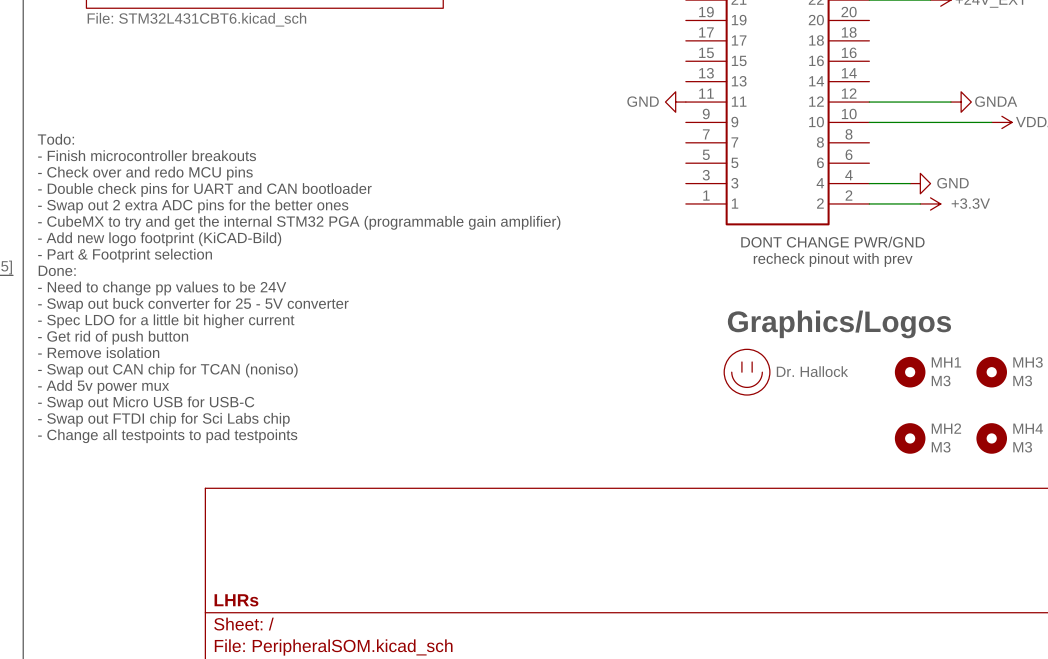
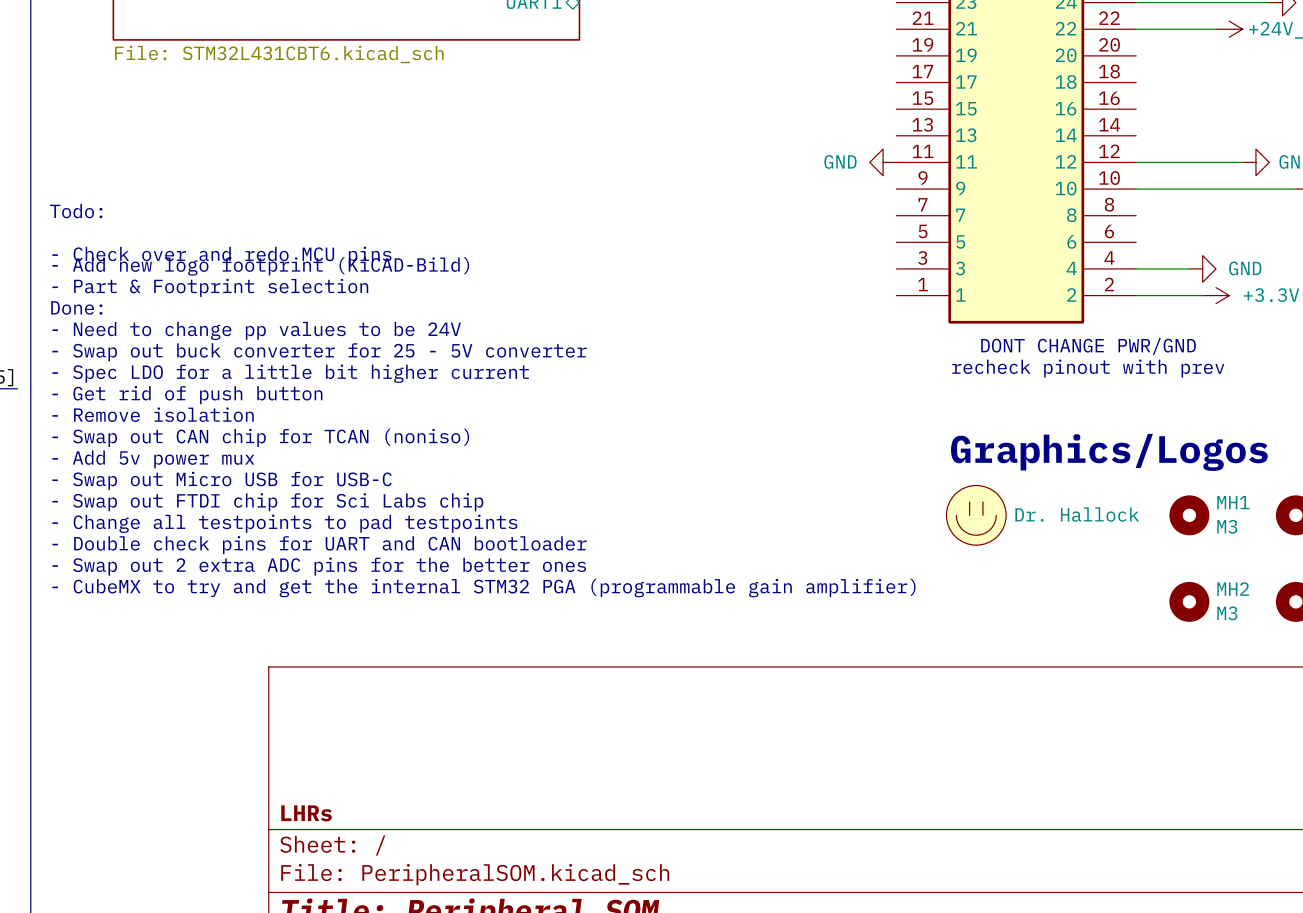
text: - Finish microcontroller breakouts (147, 155) -> none
text: - Double check pins for UART and CAN bootloader (204, 190) -> none
text: - Swap out 2 extra ADC pins for the better ones (193, 206) -> none
text: - CubeMX to try and get the internal STM32 PGA (programmable gain amplifier) (299, 222) -> none
text position: - Add new logo footprint (KiCAD-Bild) (159, 239) -> - Add new logo footprint (KiCAD-Bild) (260, 266)
text position: - Part & Footprint selection (125, 255) -> - Part & Footprint selection (210, 287)
text position: Done: (57, 270) -> Done: (76, 307)
text position: - Need to change pp values to be 24V (162, 288) -> - Need to change pp values to be 24V (256, 330)
text position: - Swap out buck converter for 25 - 5V converter (193, 304) -> - Swap out buck converter for 25 - 5V converter (319, 352)
text position: - Spec LDO for a little bit higher current (166, 321) -> - Spec LDO for a little bit higher current (290, 373)
text position: - Get rid of push button (113, 337) -> - Get rid of push button (187, 395)
text position: - Remove isolation (98, 352) -> - Remove isolation (153, 414)
text position: - Swap out CAN chip for TCAN (noniso) (167, 370) -> - Swap out CAN chip for TCAN (noniso) (260, 437)
text position: - Add 5v power mux (103, 386) -> - Add 5v power mux (153, 459)
text: none -> - Double check pins for UART and CAN bootloader (319, 545)
text position: - Swap out Micro USB for USB-C (146, 403) -> - Swap out Micro USB for USB-C (222, 480)
text: none -> - Swap out 2 extra ADC pins for the better ones (319, 566)
text position: - Swap out FTDI chip for Sci Labs chip (163, 419) -> - Swap out FTDI chip for Sci Labs chip (267, 502)
text: none -> - CubeMX to try and get the internal STM32 PGA (programmable gain amplifier) (483, 588)
text position: - Change all testpoints to pad testpoints (167, 436) -> - Change all testpoints to pad testpoints (284, 523)

